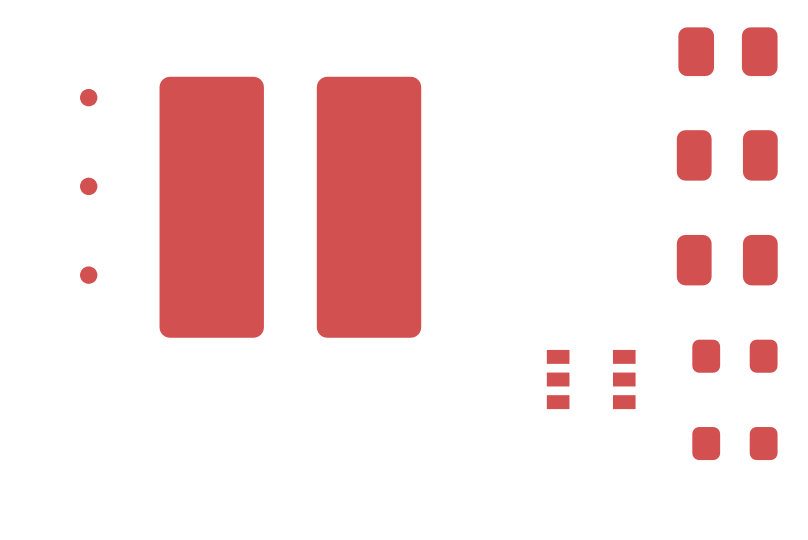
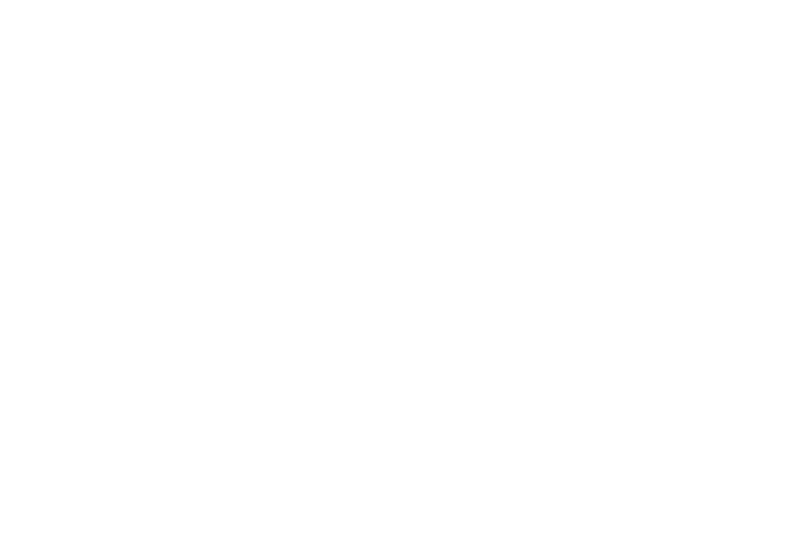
part: (727, 51) -> none
part: (88, 97) -> none
part: (727, 155) -> none
part: (88, 186) -> none
part: (211, 207) -> none
part: (369, 207) -> none
part: (727, 260) -> none
part: (88, 275) -> none
part: (734, 356) -> none
part: (591, 379) -> none
part: (734, 443) -> none

